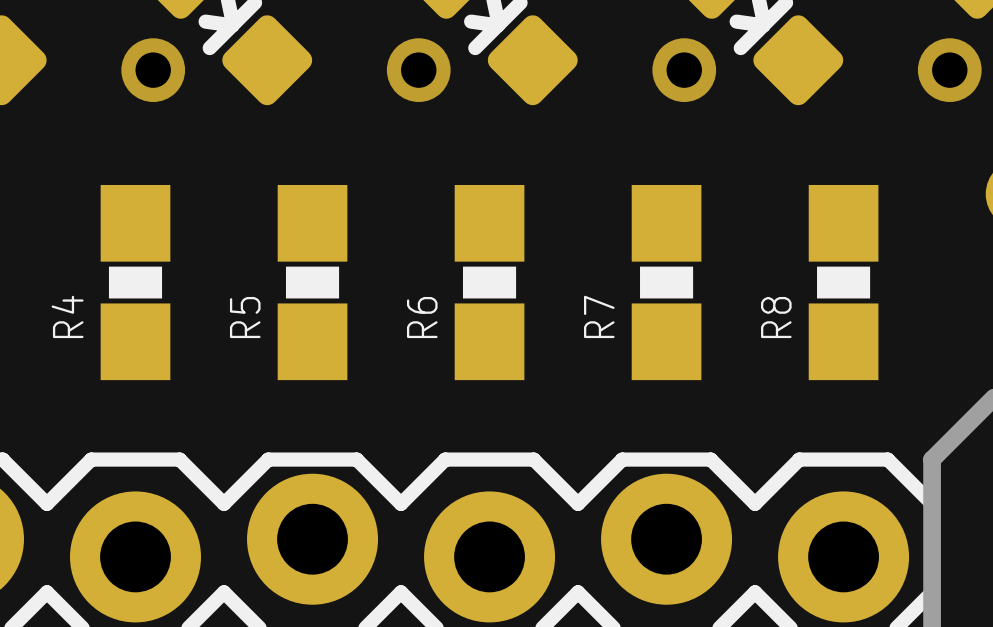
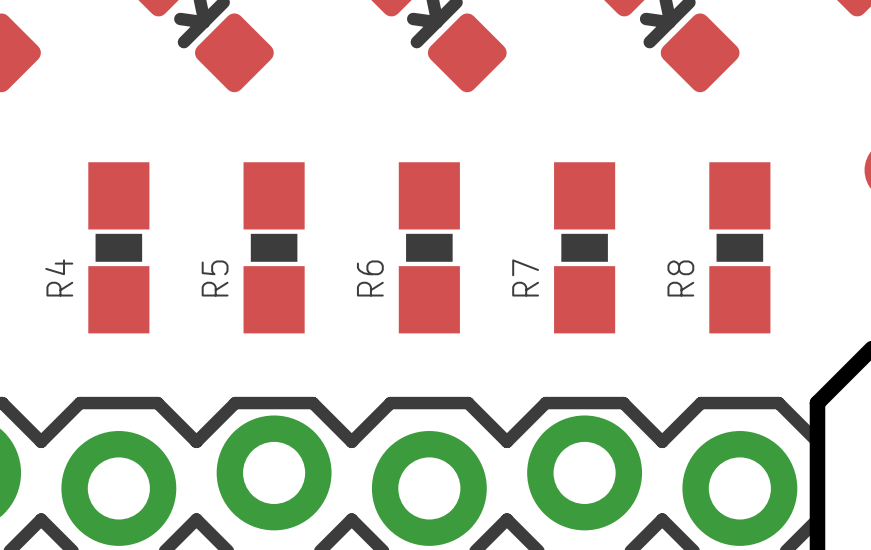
via: (153, 70) -> none
via: (418, 70) -> none
via: (684, 70) -> none
via: (949, 70) -> none

